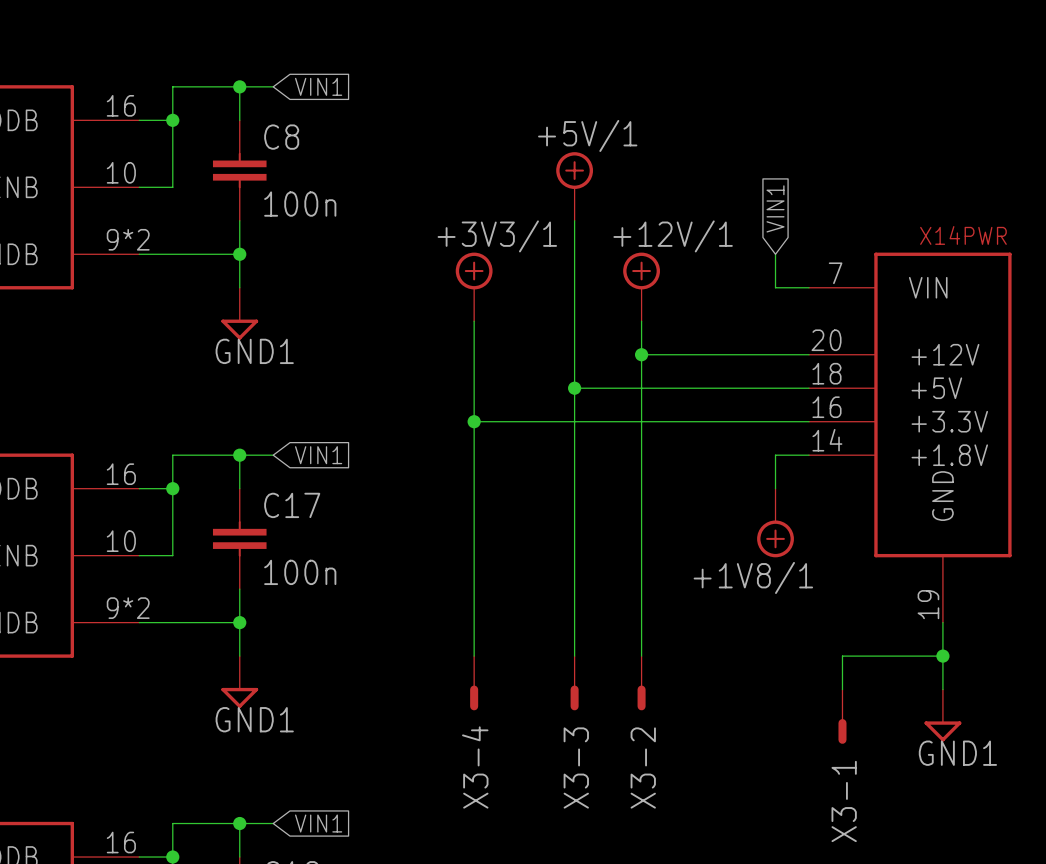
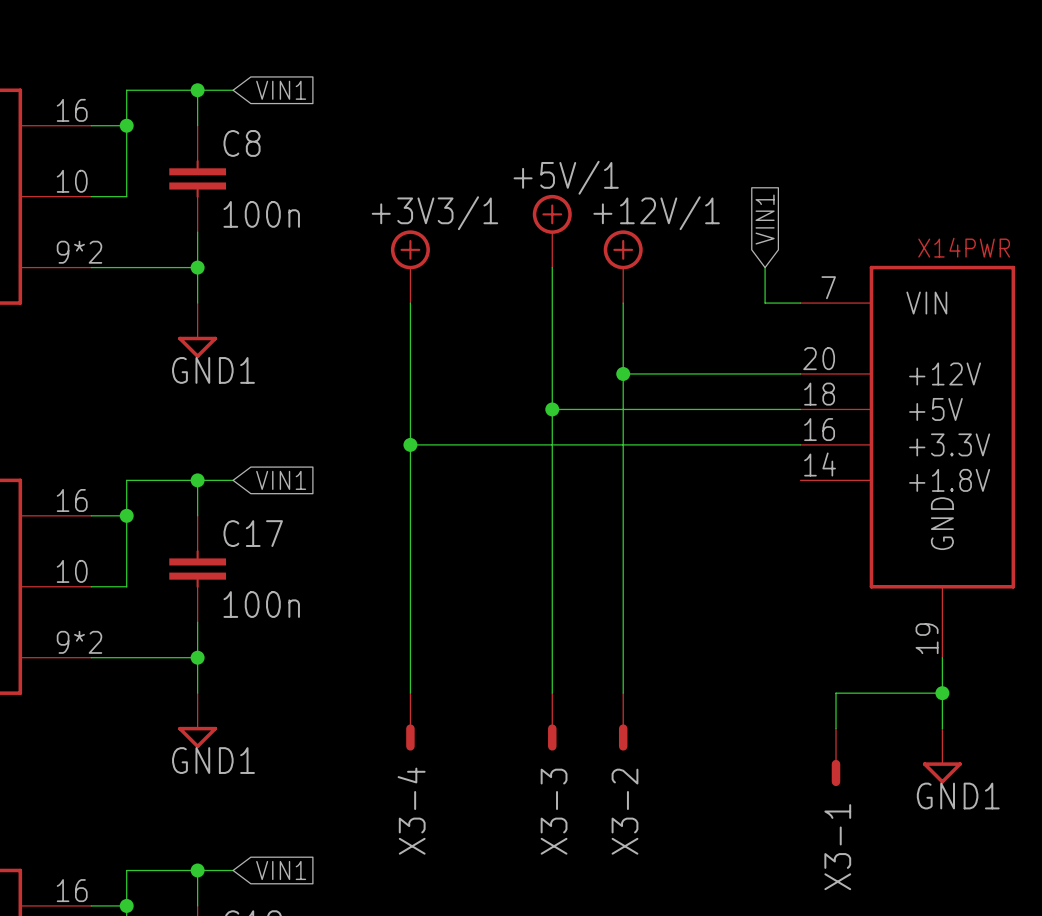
power symbol position: +5V/1 (574, 186) -> +5V/1 (552, 231)
power symbol position: +3V3/1 (474, 286) -> +3V3/1 (410, 266)
power symbol position: +12V/1 (641, 286) -> +12V/1 (623, 266)
wire: none -> (410, 303) (410, 693)
wire: (474, 321) (474, 656) -> none
wire: none -> (410, 444) (445, 444)
junction position: (474, 421) -> (410, 444)
wire: (808, 455) (775, 455) (775, 488) -> none
power symbol: +1V8/1 (775, 522) -> none
X3-4 position: (474, 683) -> (410, 721)

